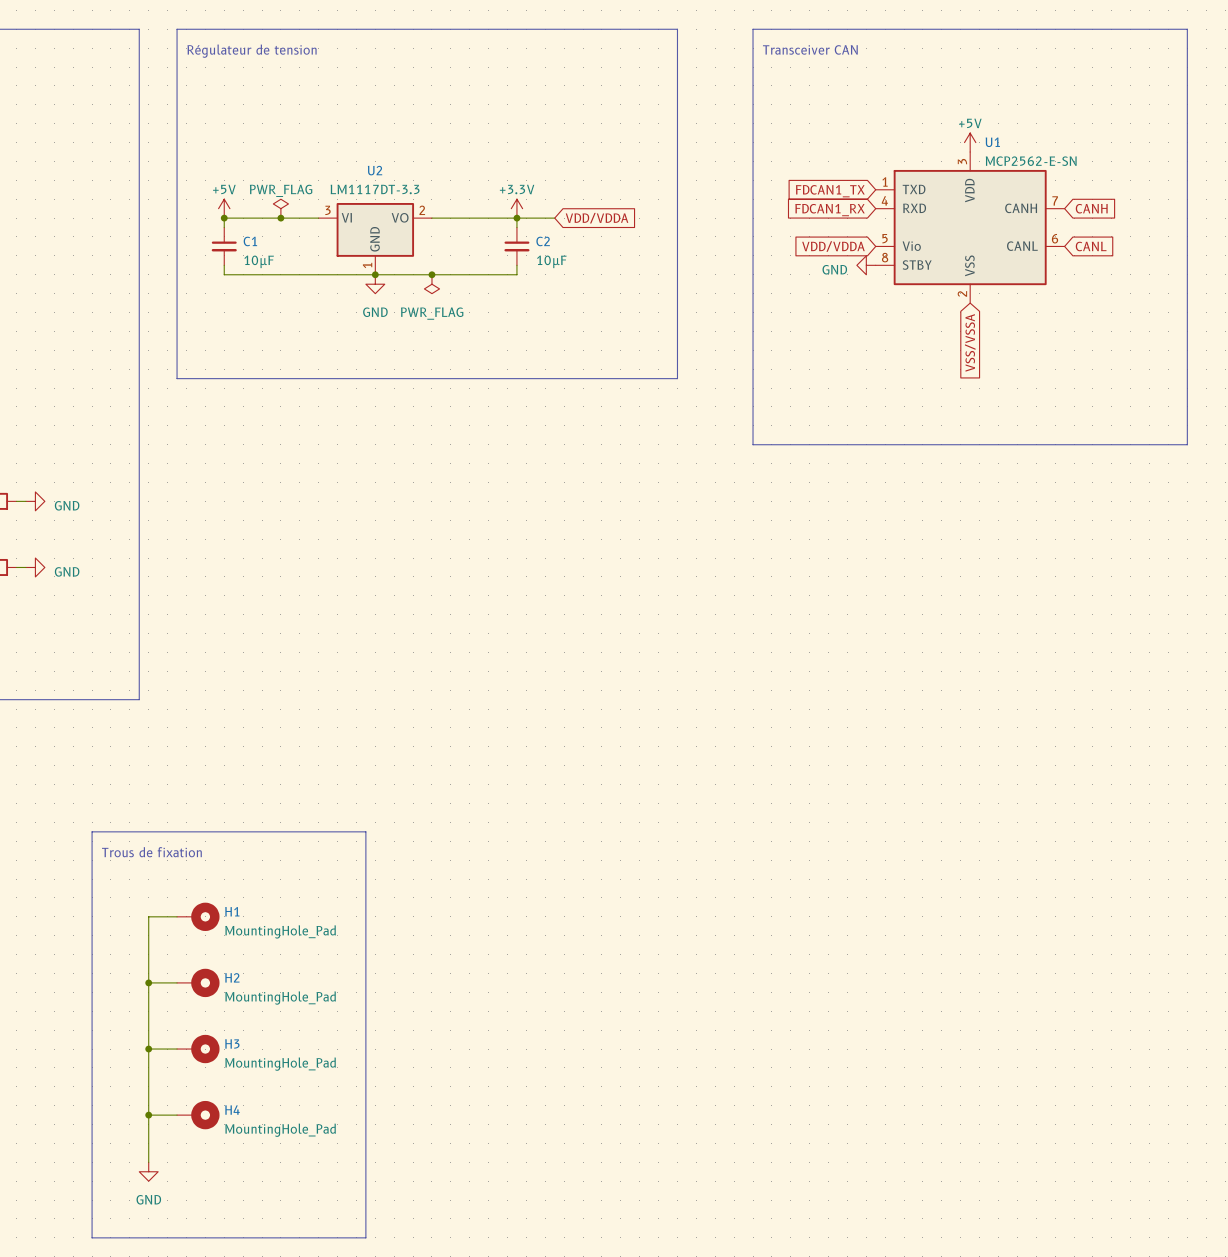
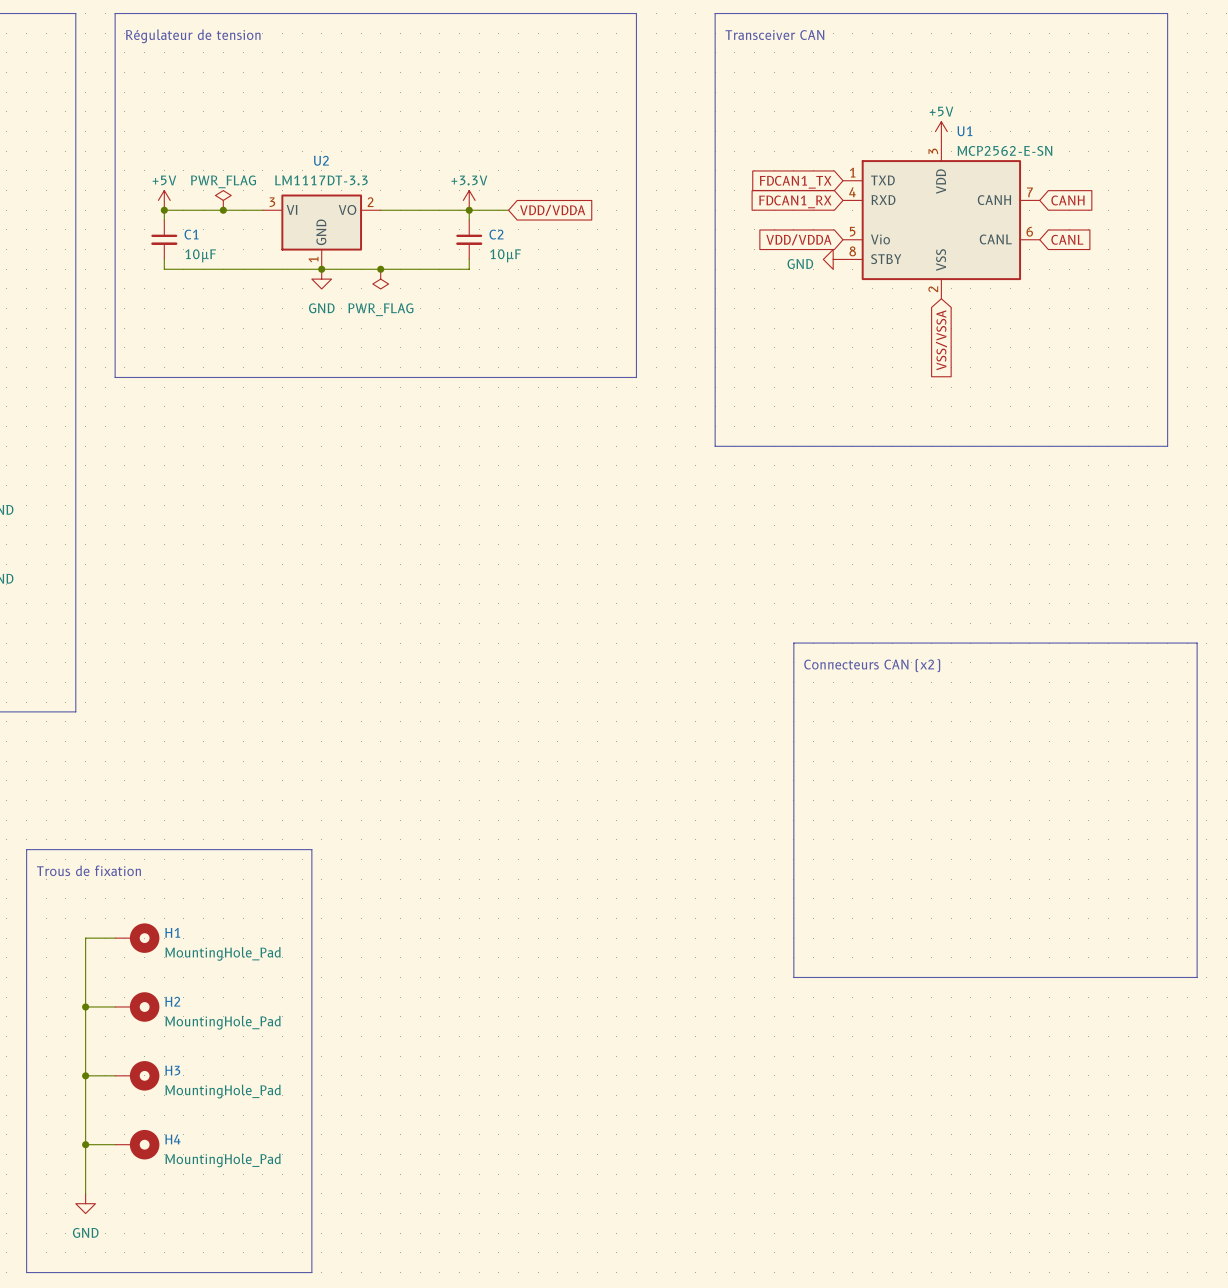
line: none -> (793, 643) (1197, 643) (1197, 977) (793, 977) (793, 643)
text: none -> Connecteurs CAN (x2) (872, 665)

